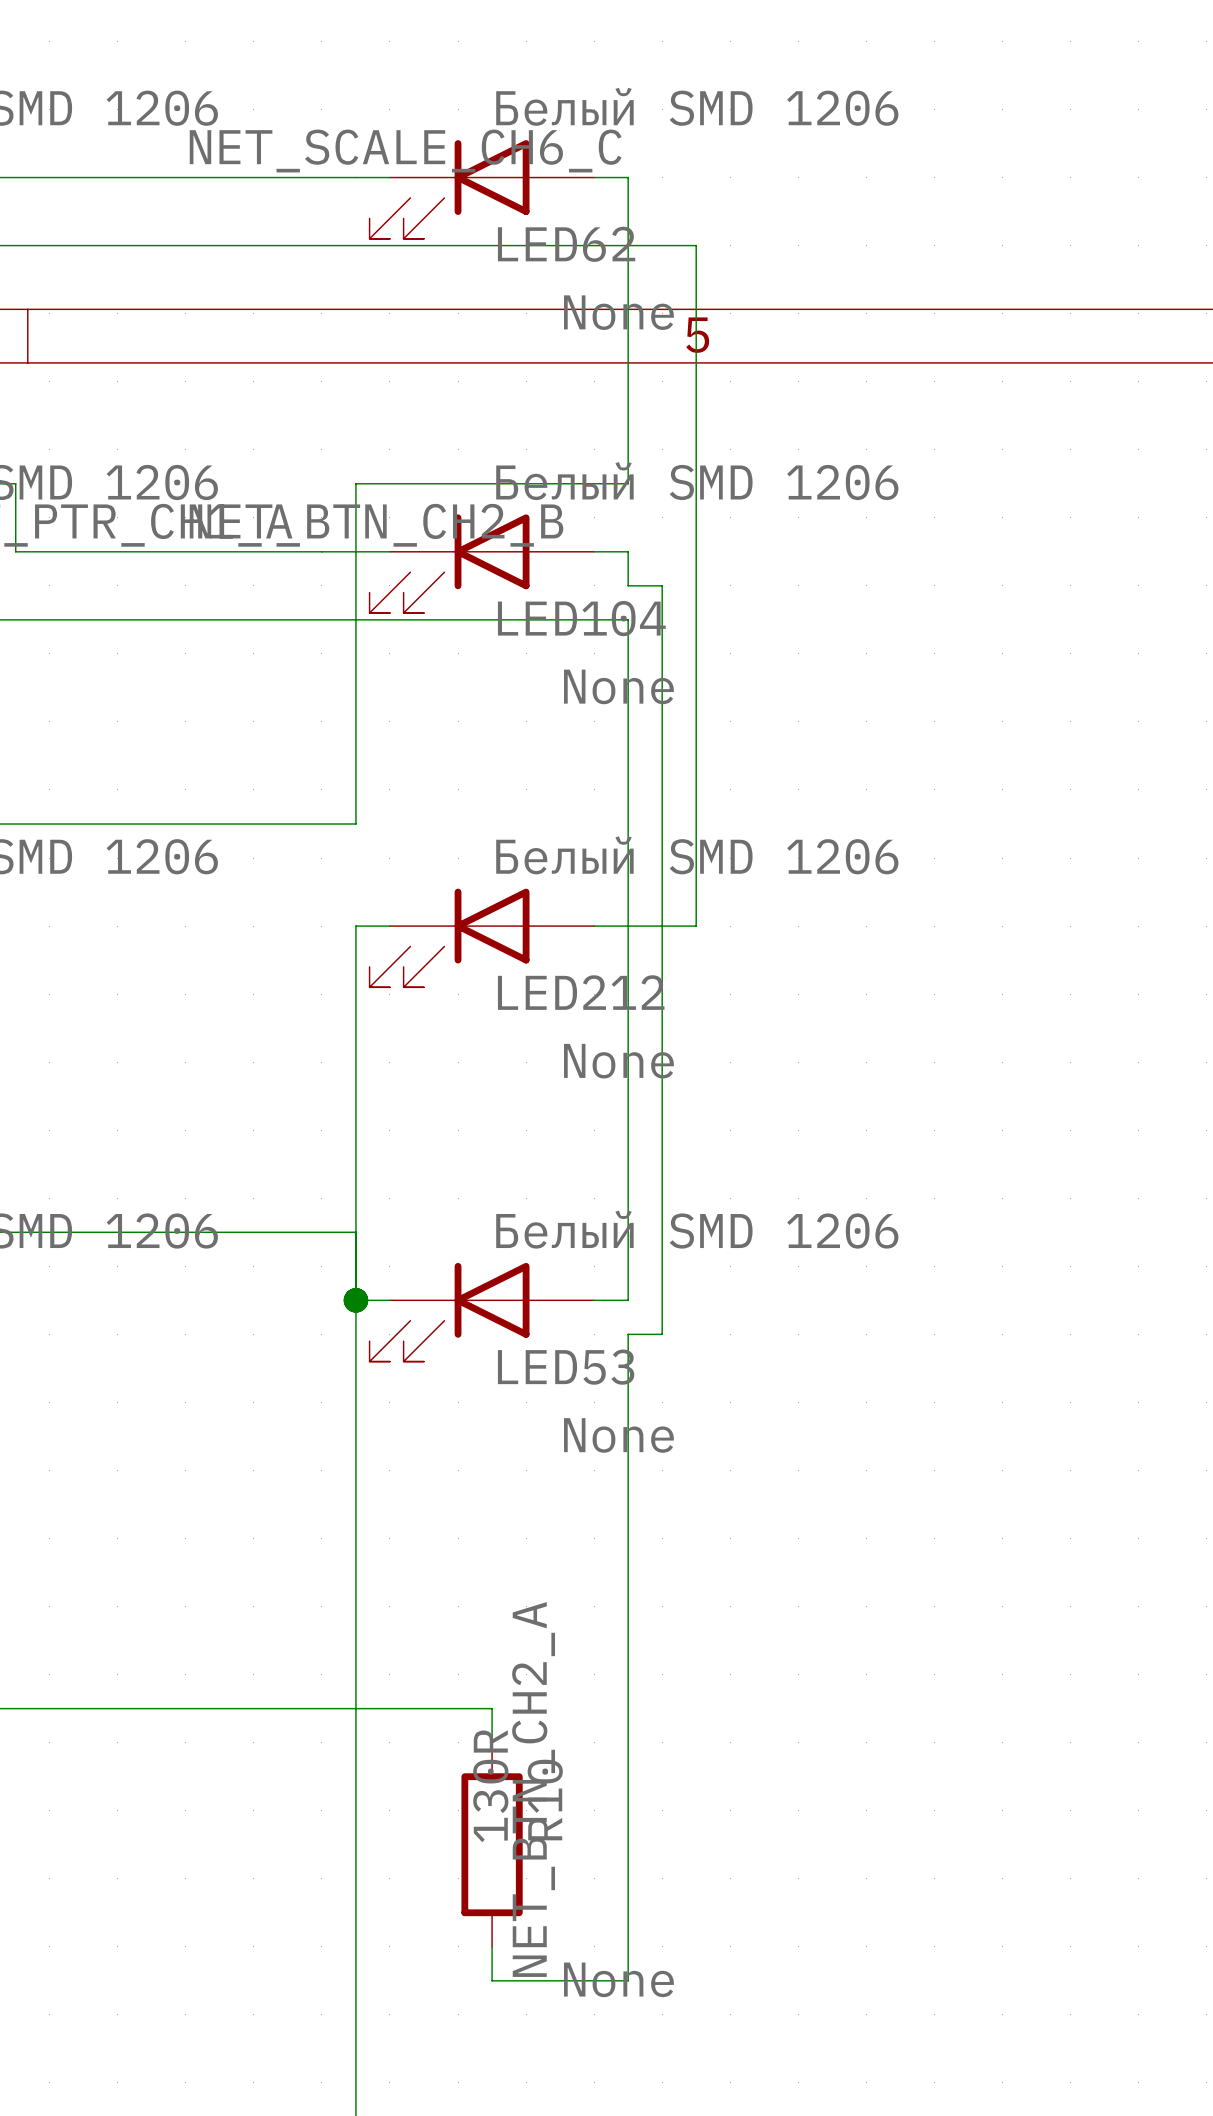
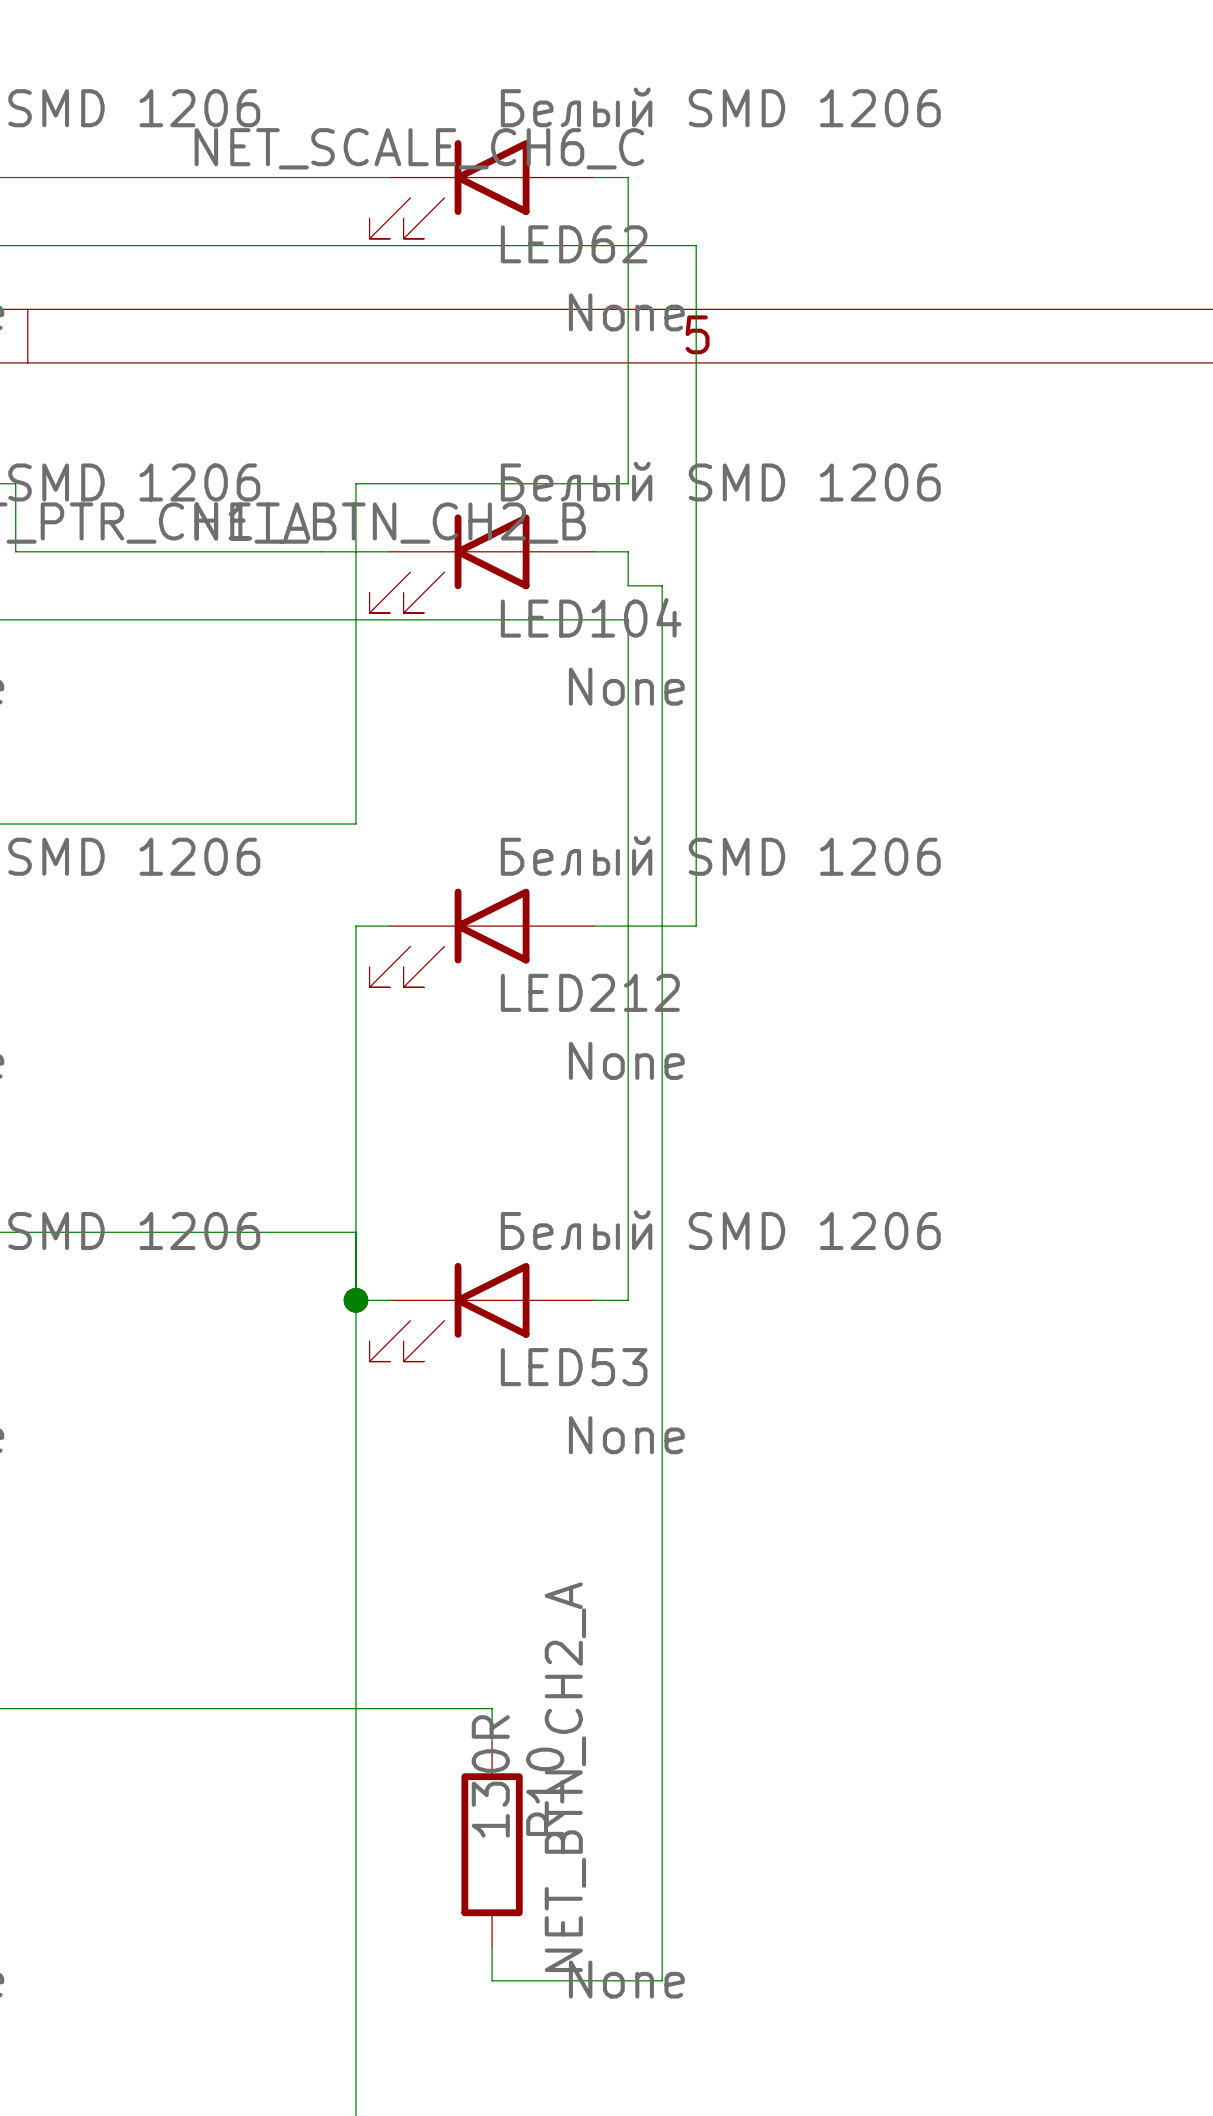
wire: (662, 1334) (628, 1334) (628, 1980) -> (662, 1334) (662, 1980) (628, 1980)
label position: NET_BTN_CH2_A (533, 1789) -> NET_BTN_CH2_A (565, 1777)

